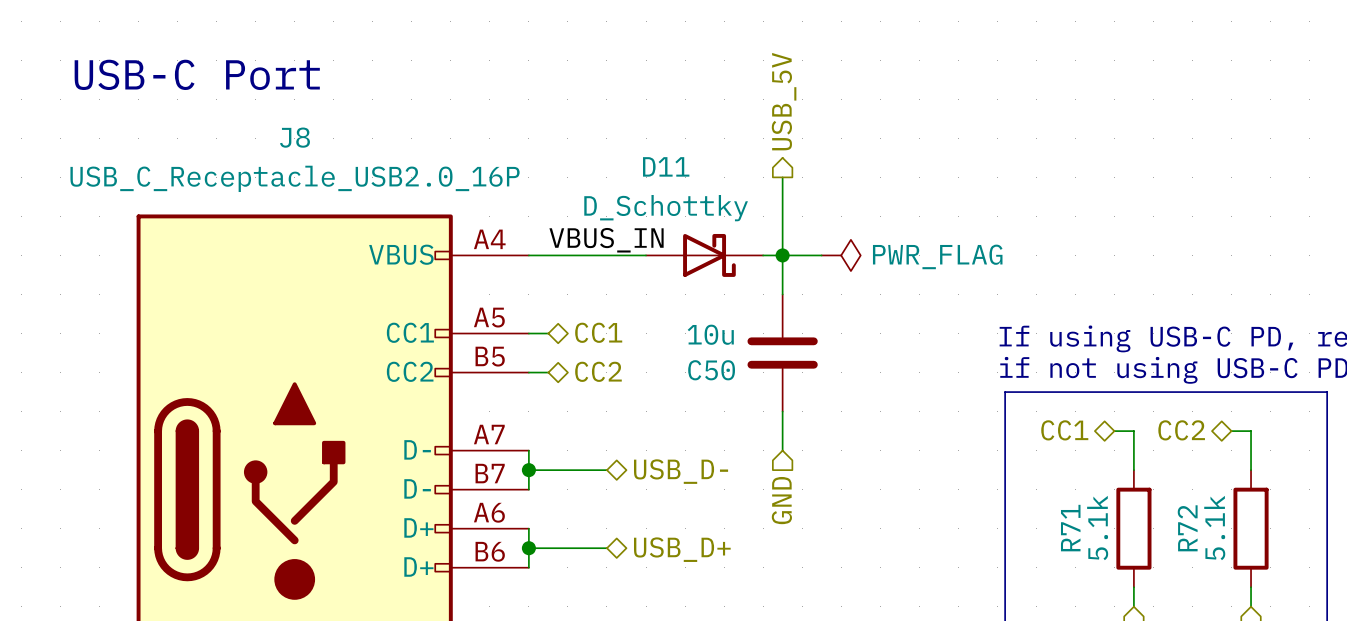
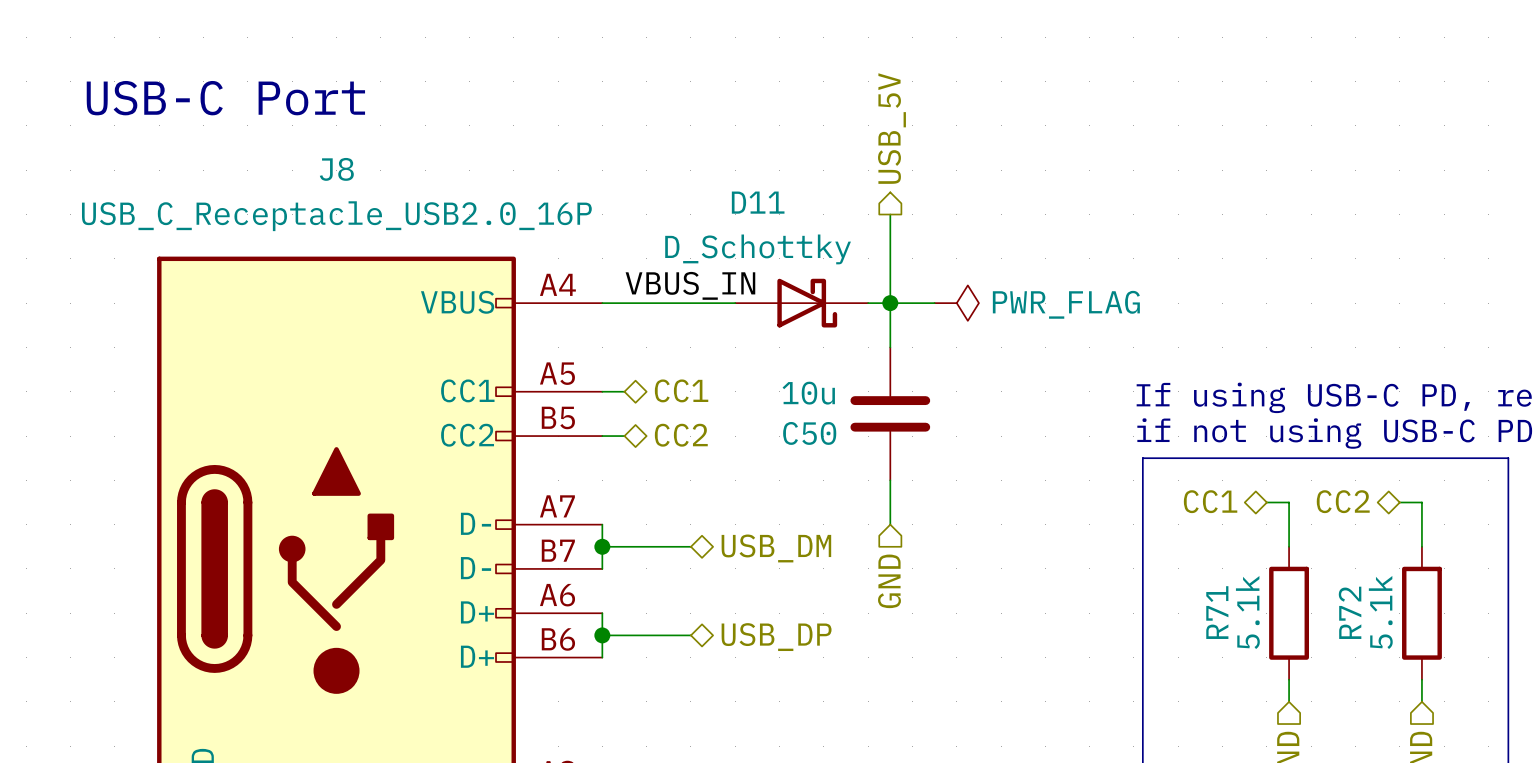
hierarchical label: USB_D- (681, 471) -> USB_DM (776, 548)
hierarchical label: USB_D+ (682, 549) -> USB_DP (776, 637)

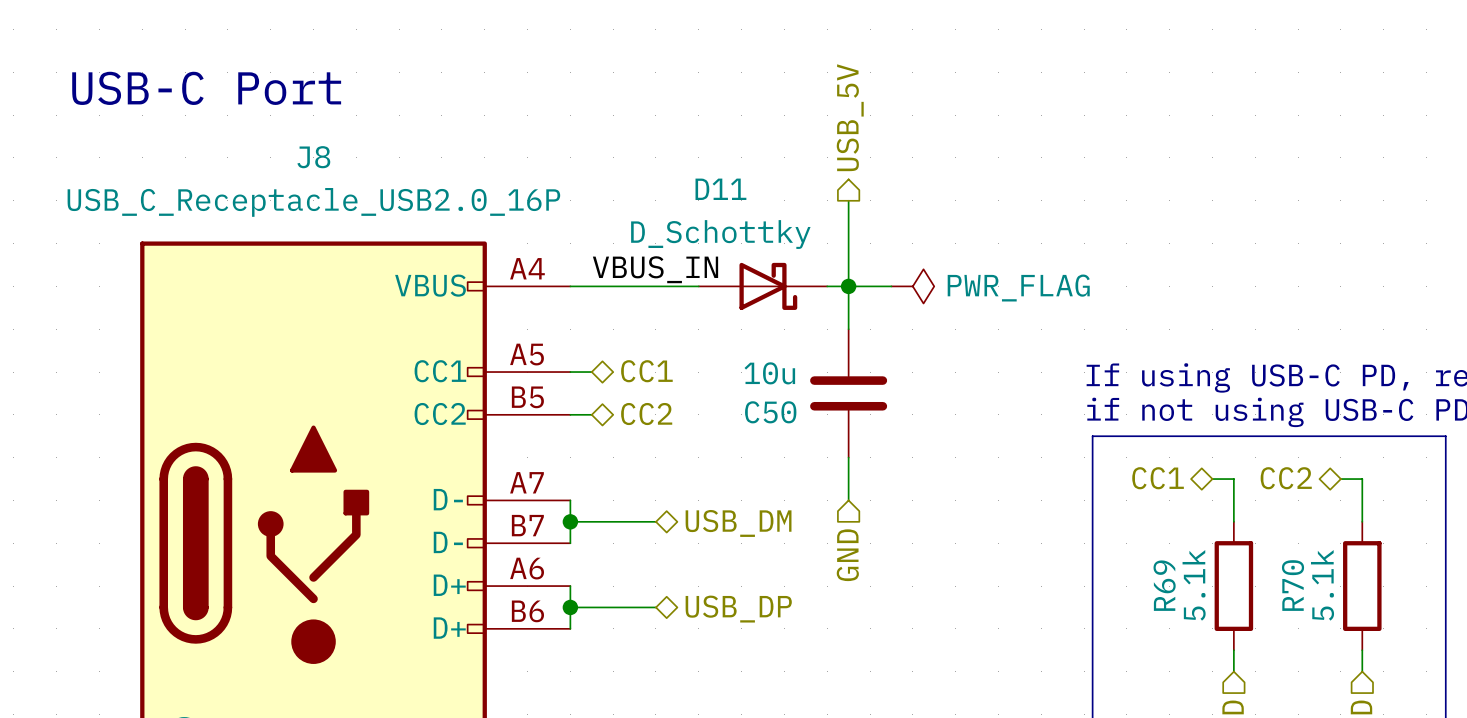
R71 name: R71 (1217, 612) -> R69 (1164, 585)
R72 name: R72 (1350, 612) -> R70 (1293, 585)

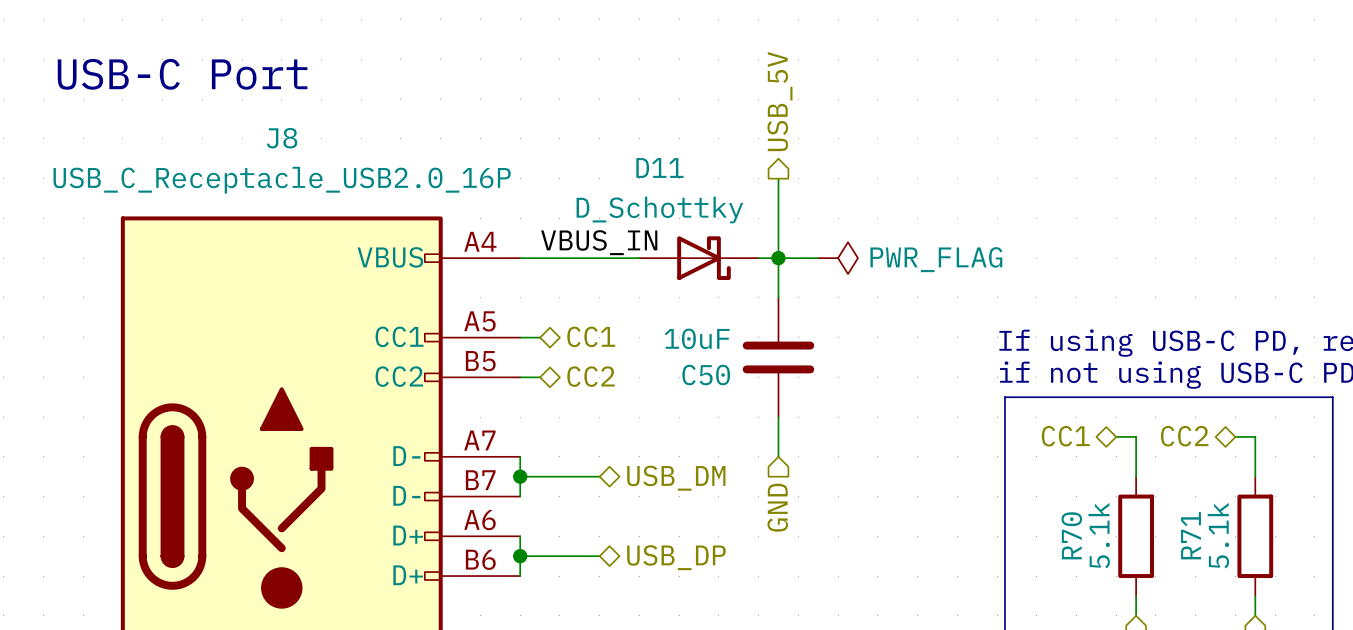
C50 value: 10u (769, 373) -> 10uF (697, 338)
R69 name: R69 (1164, 585) -> R70 (1071, 535)
R70 name: R70 (1293, 585) -> R71 (1190, 535)

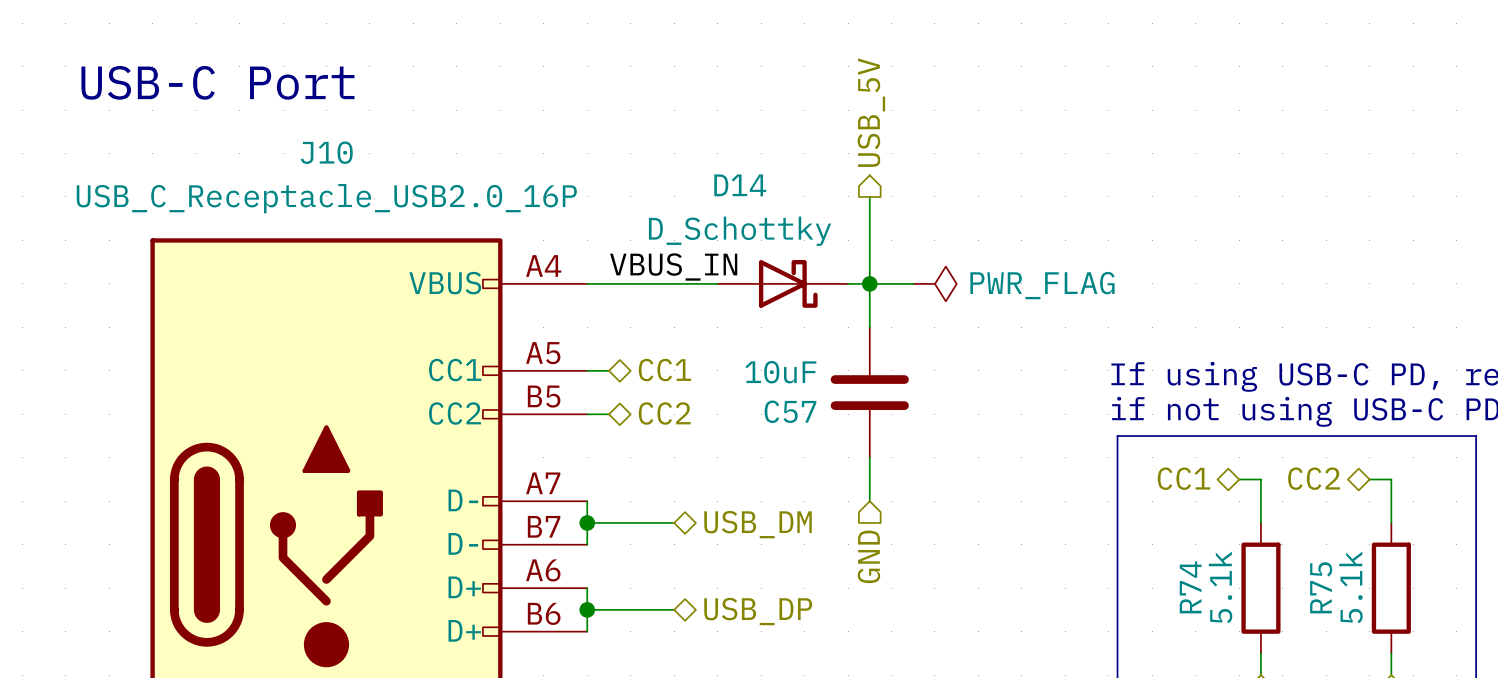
J8 name: J8 (282, 138) -> J10 (326, 152)
D11 name: D11 (659, 167) -> D14 (740, 185)
C50 name: C50 (706, 375) -> C57 (790, 411)
R70 name: R70 (1071, 535) -> R74 (1190, 587)
R71 name: R71 (1190, 535) -> R75 (1321, 587)

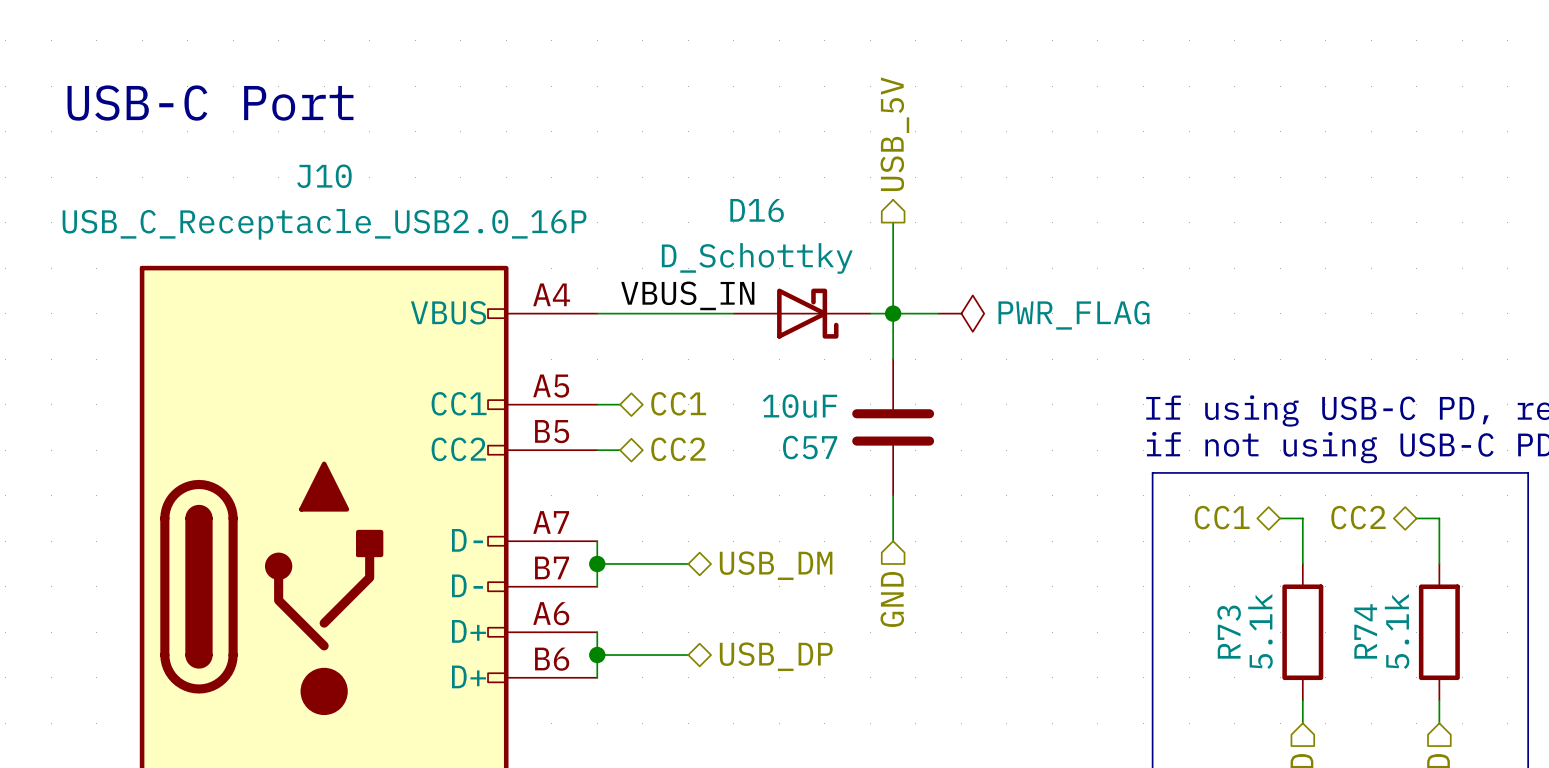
D14 name: D14 (740, 185) -> D16 (757, 210)
R74 name: R74 (1190, 587) -> R73 (1229, 632)
R75 name: R75 (1321, 587) -> R74 (1365, 631)

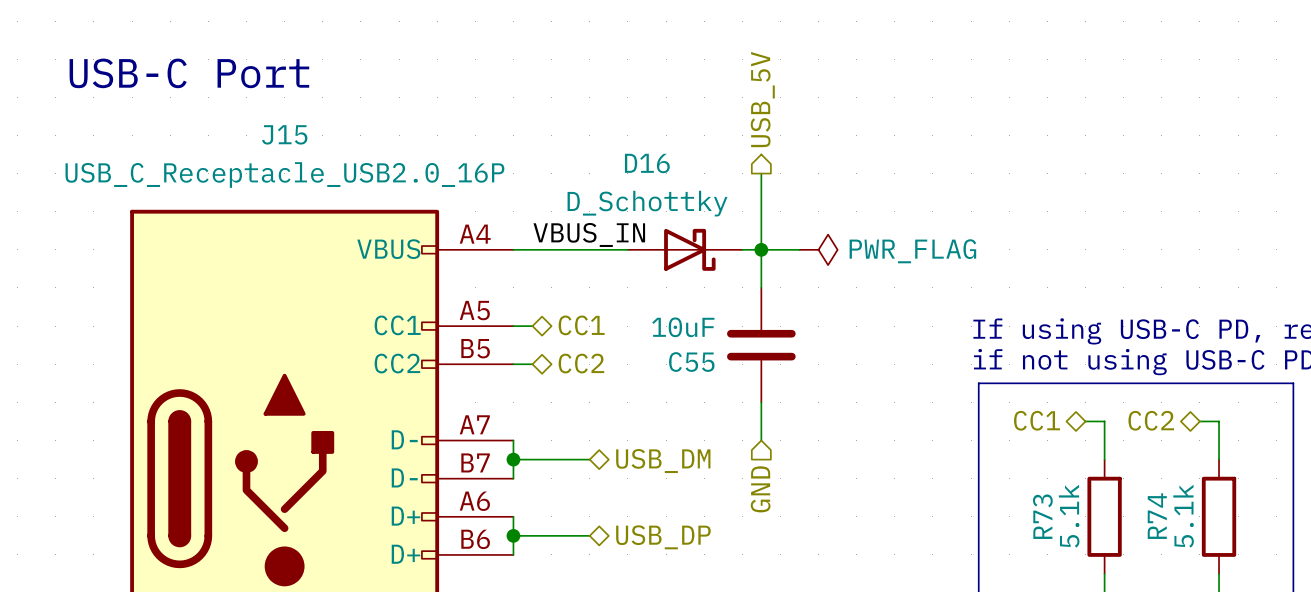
J10 name: J10 (324, 176) -> J15 (284, 134)
C57 name: C57 (810, 447) -> C55 (691, 362)

